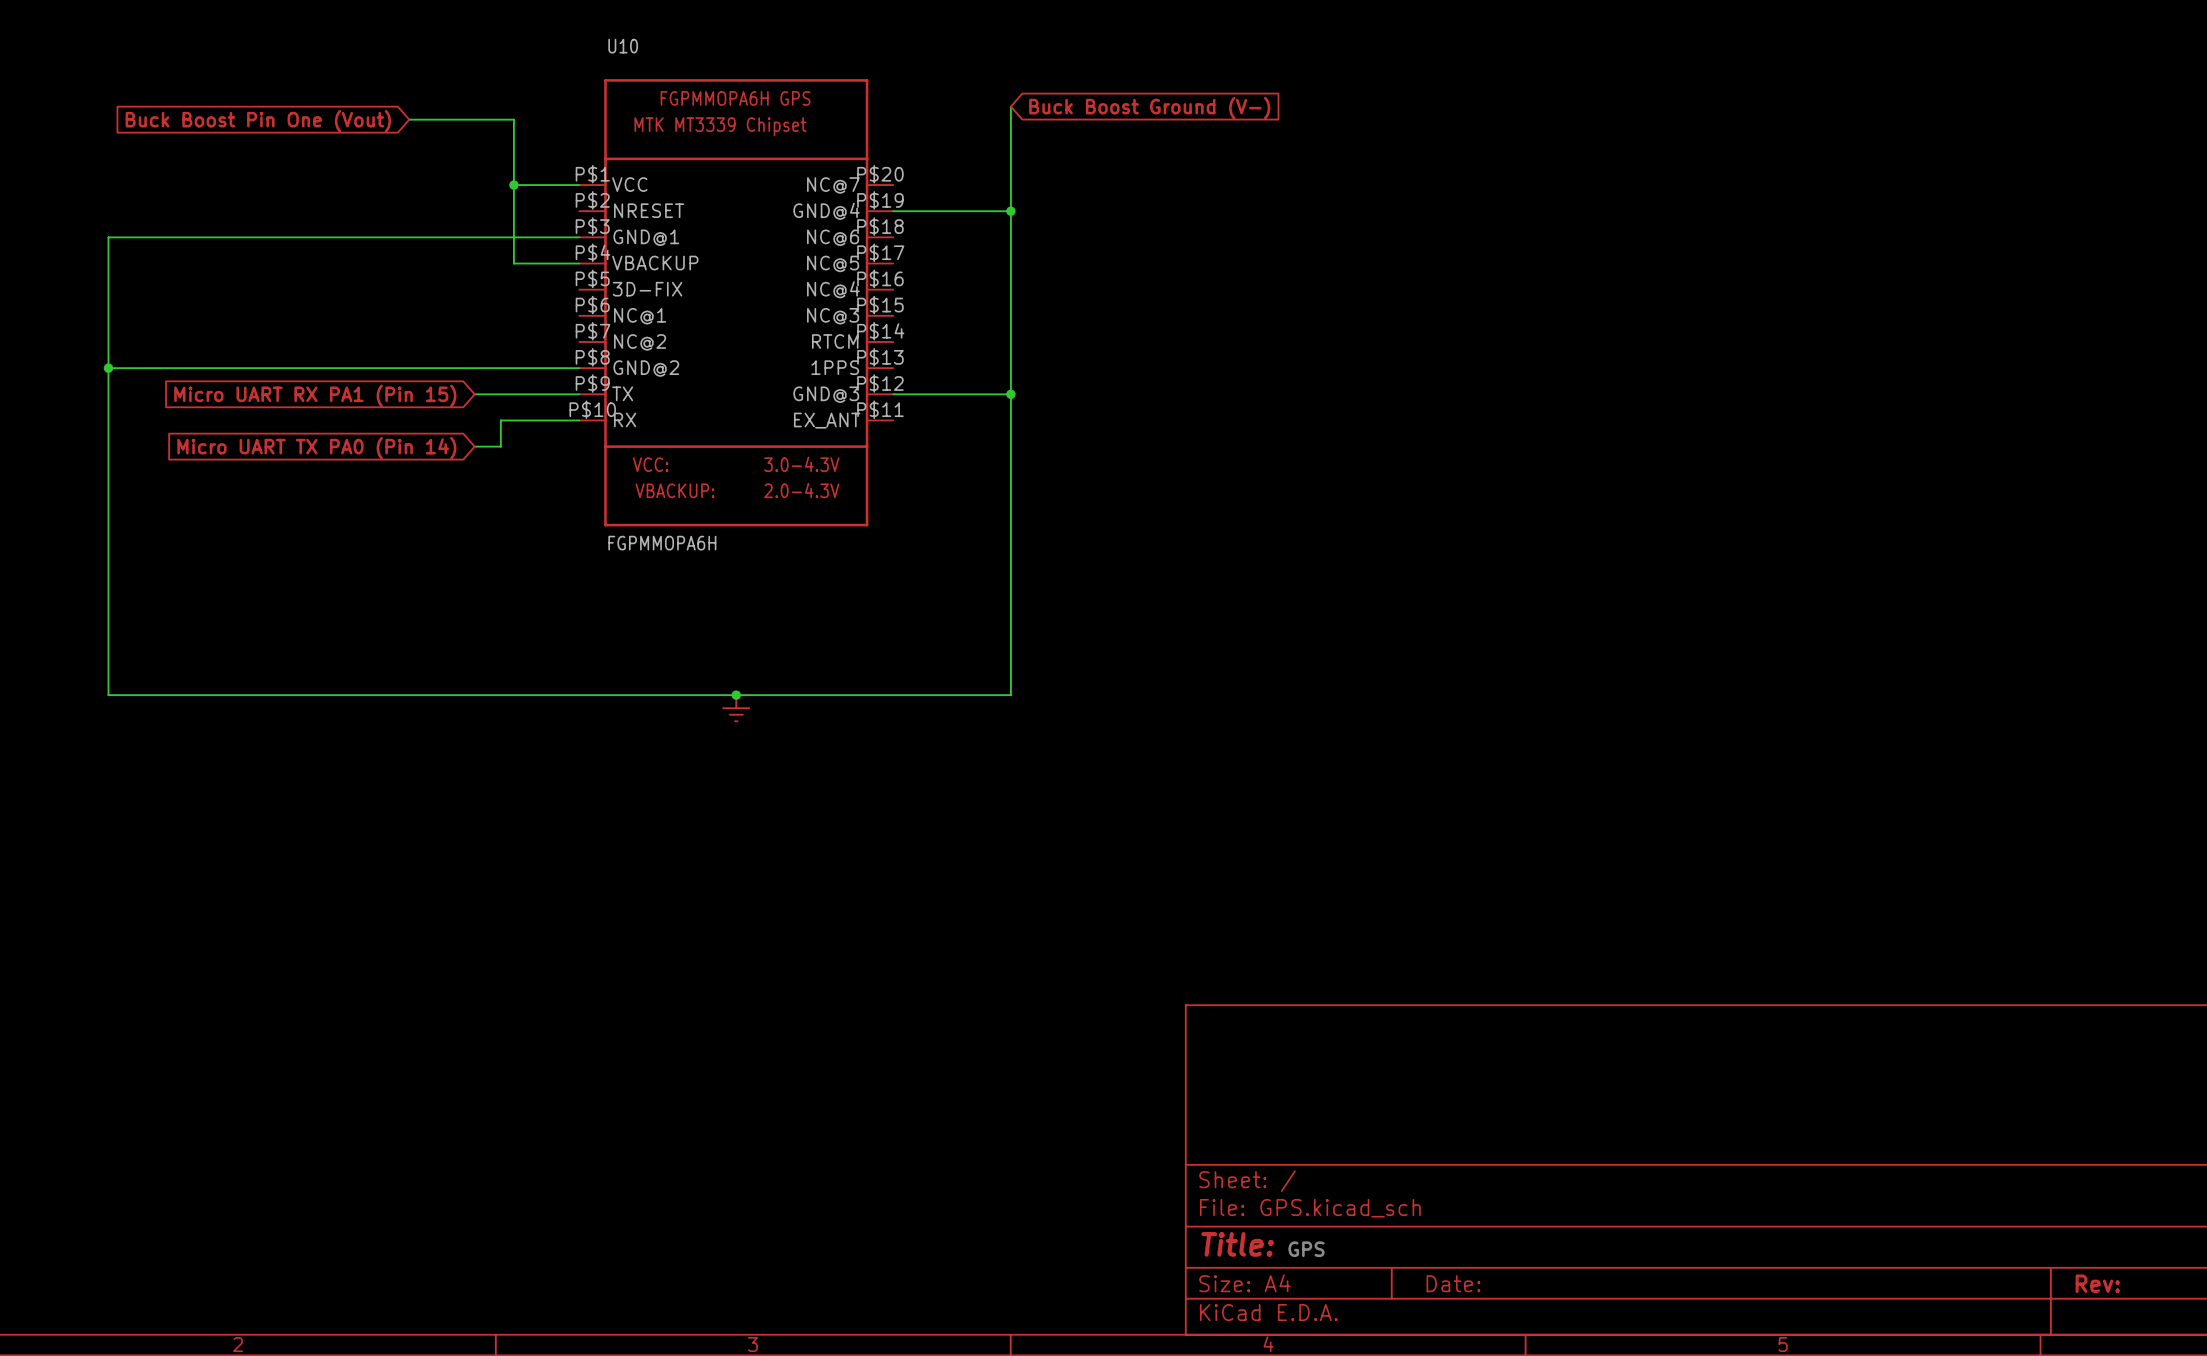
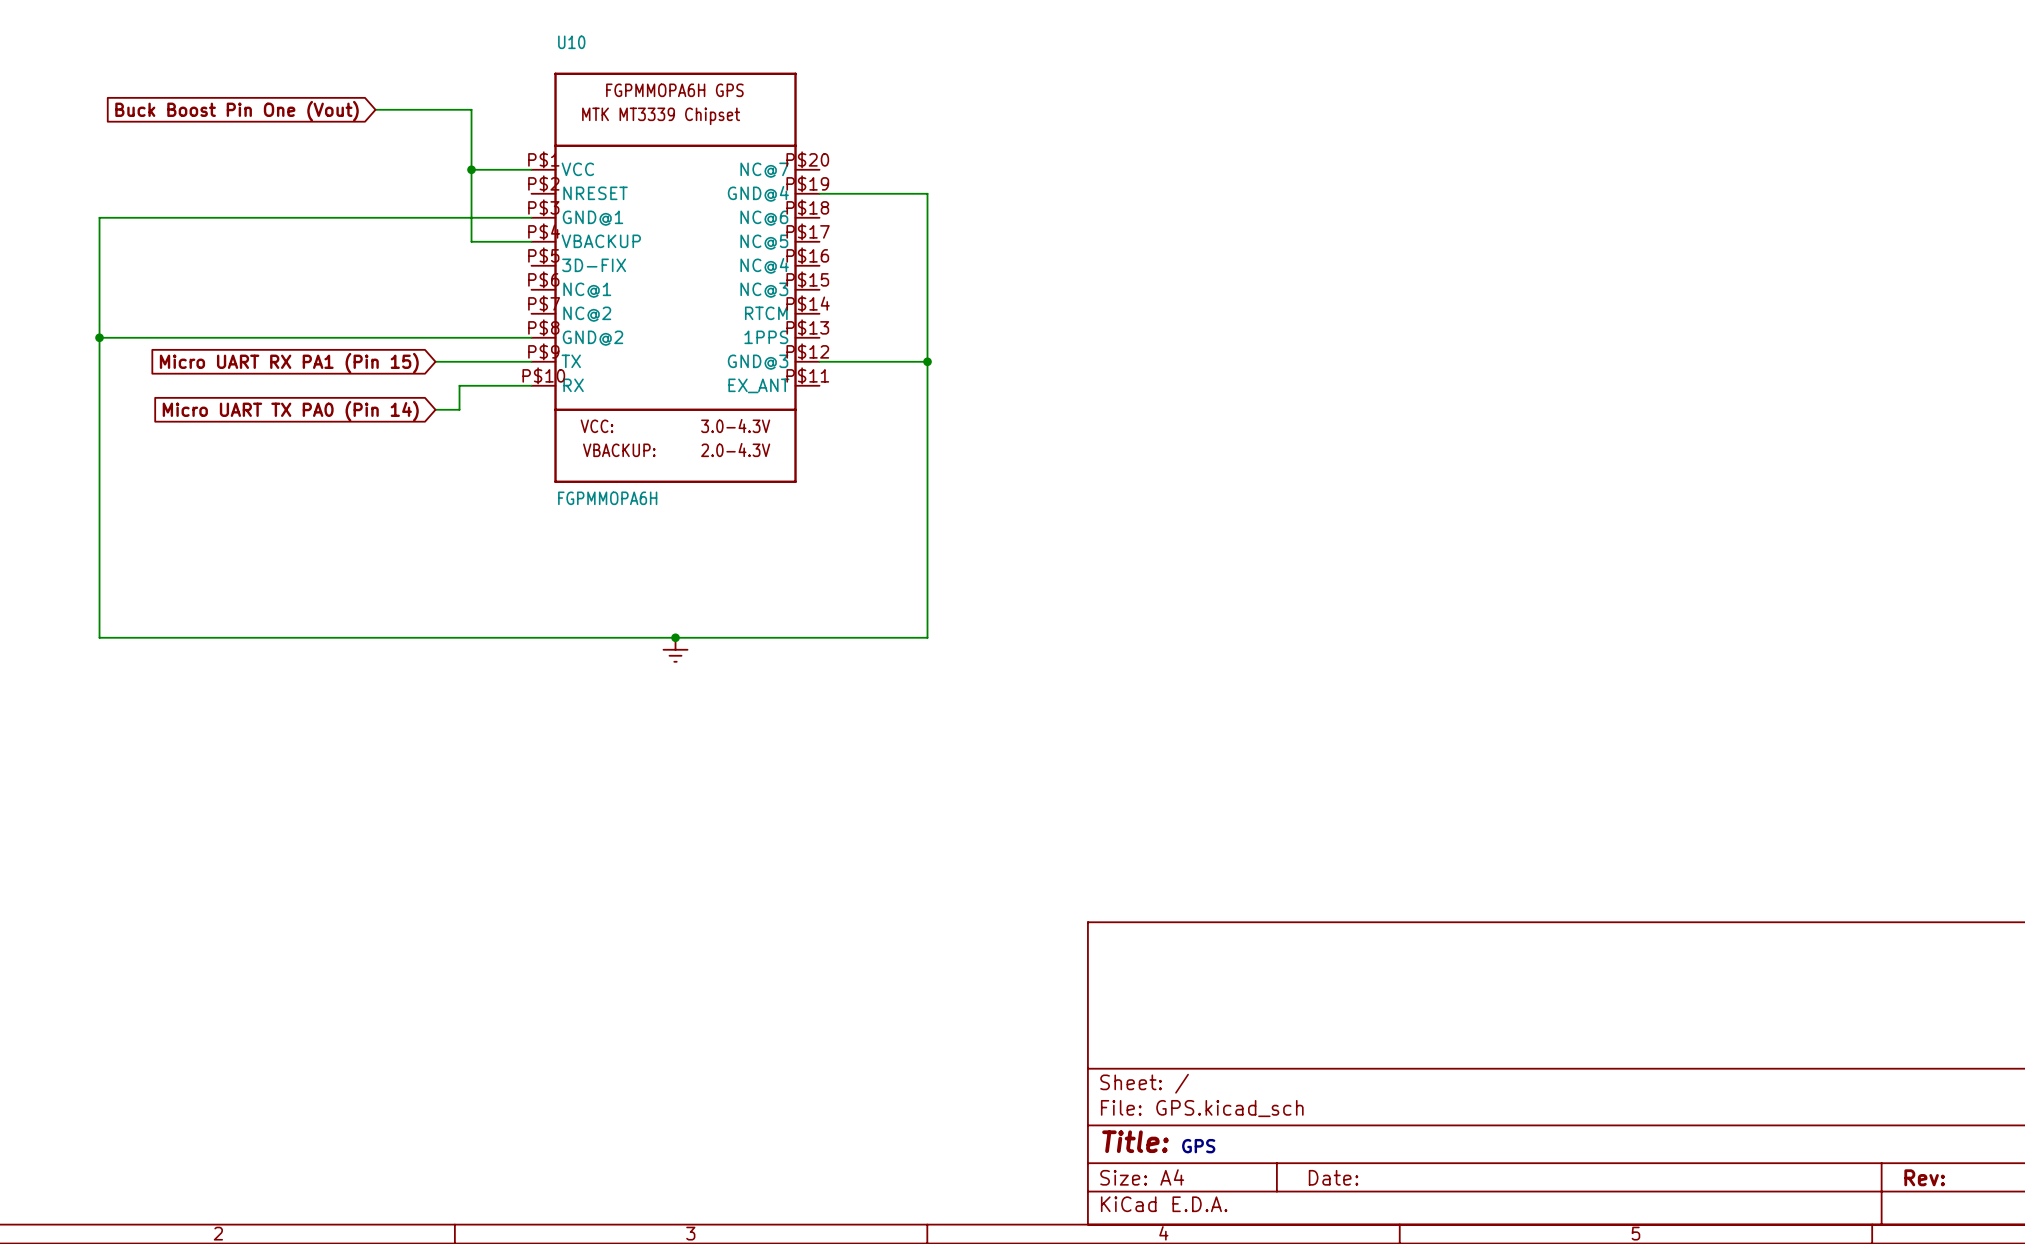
wire: (1010, 106) (1010, 211) -> none
global label: Buck Boost Ground (V-) (1149, 108) -> none
junction: (1010, 211) -> none

